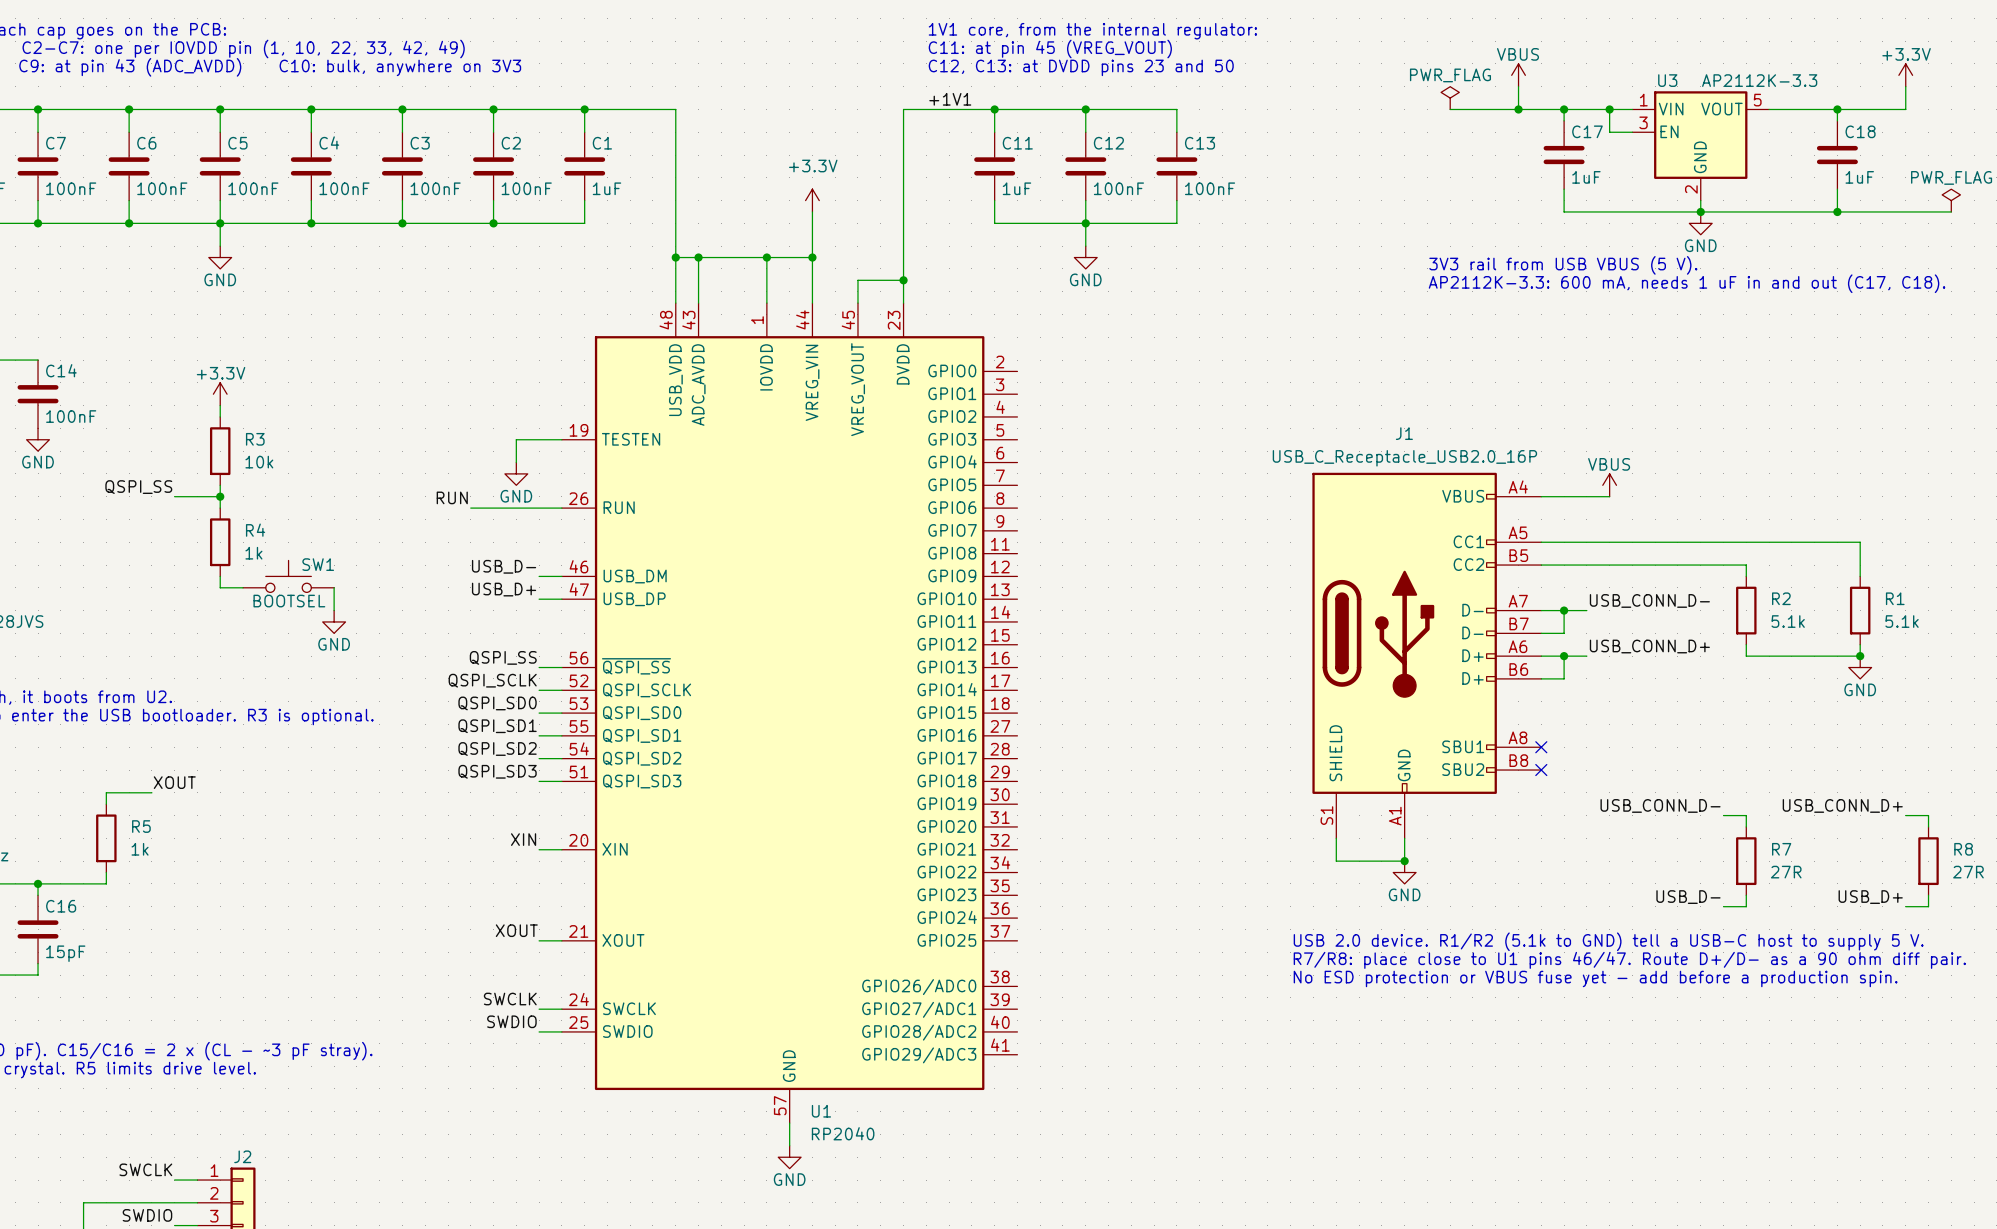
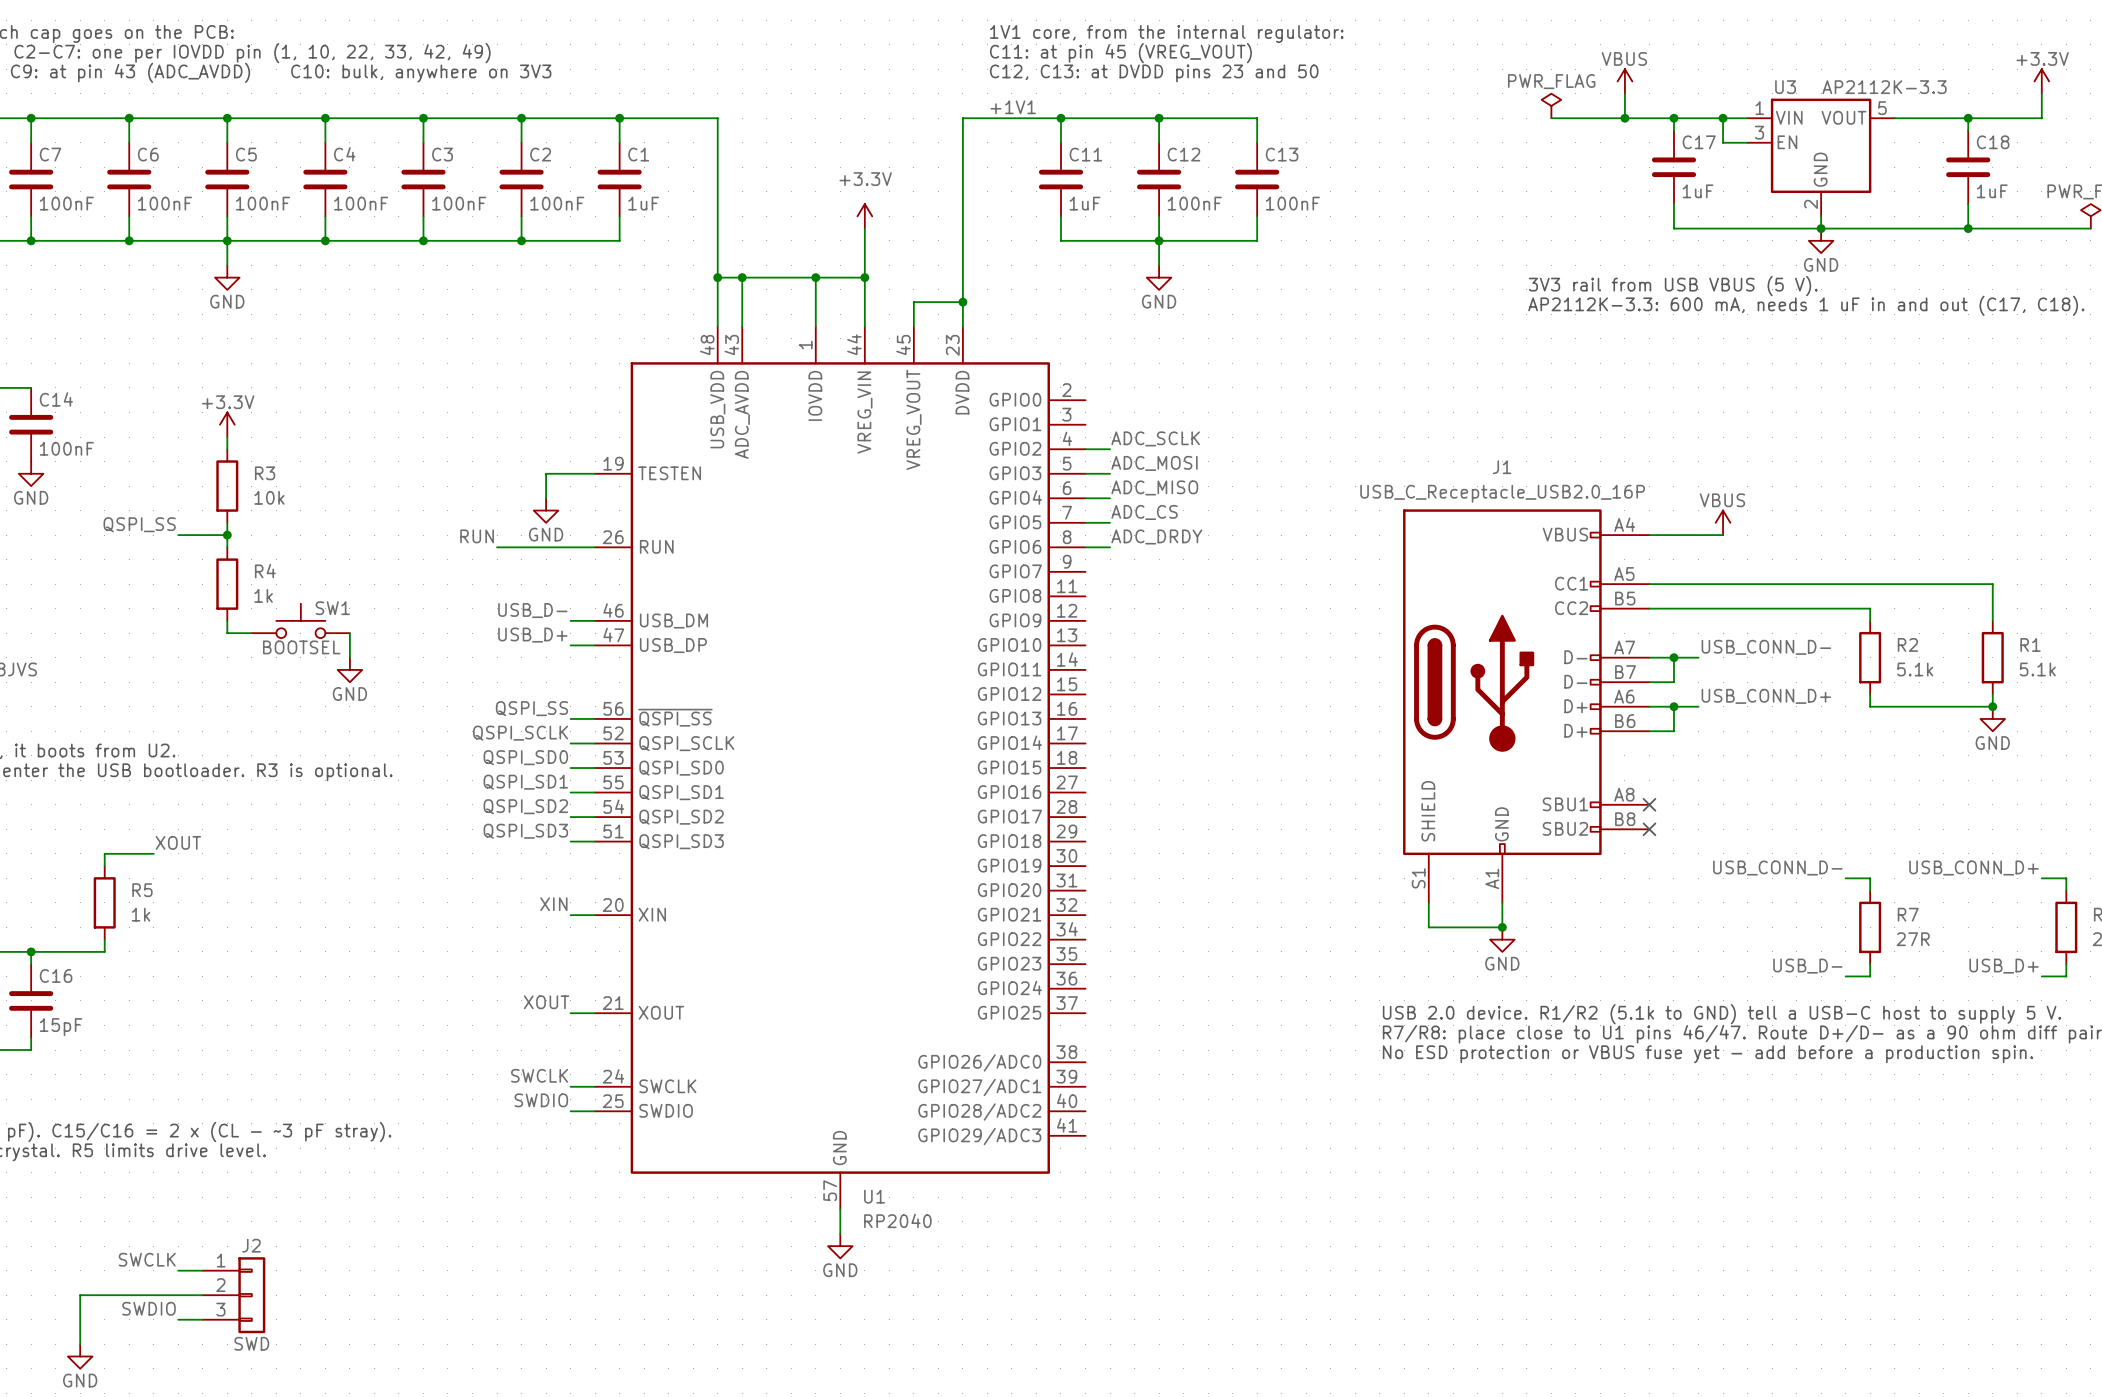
label: none -> ADC_SCLK (1155, 438)
wire: none -> (1085, 449) (1110, 449)
label: none -> ADC_MOSI (1154, 463)
wire: none -> (1085, 473) (1110, 473)
label: none -> ADC_MISO (1154, 487)
wire: none -> (1085, 498) (1110, 498)
label: none -> ADC_CS (1144, 512)
wire: none -> (1085, 522) (1110, 522)
label: none -> ADC_DRDY (1156, 536)
wire: none -> (1085, 547) (1110, 547)

